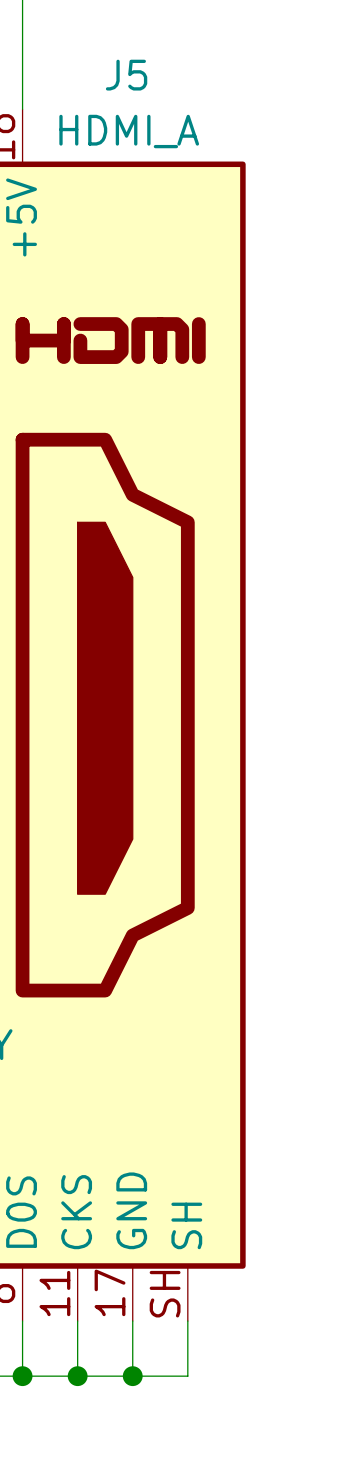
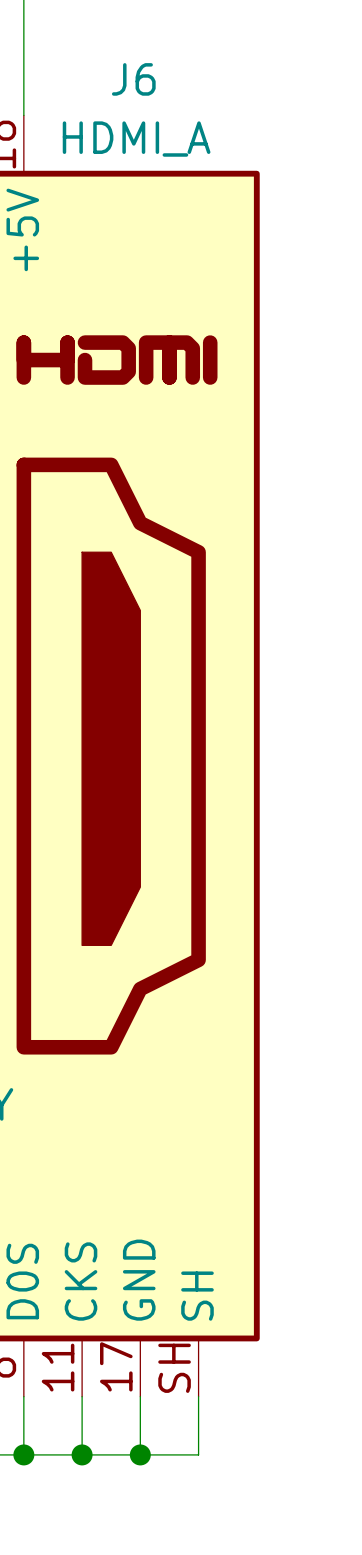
J5 name: J5 (126, 75) -> J6 (133, 79)

